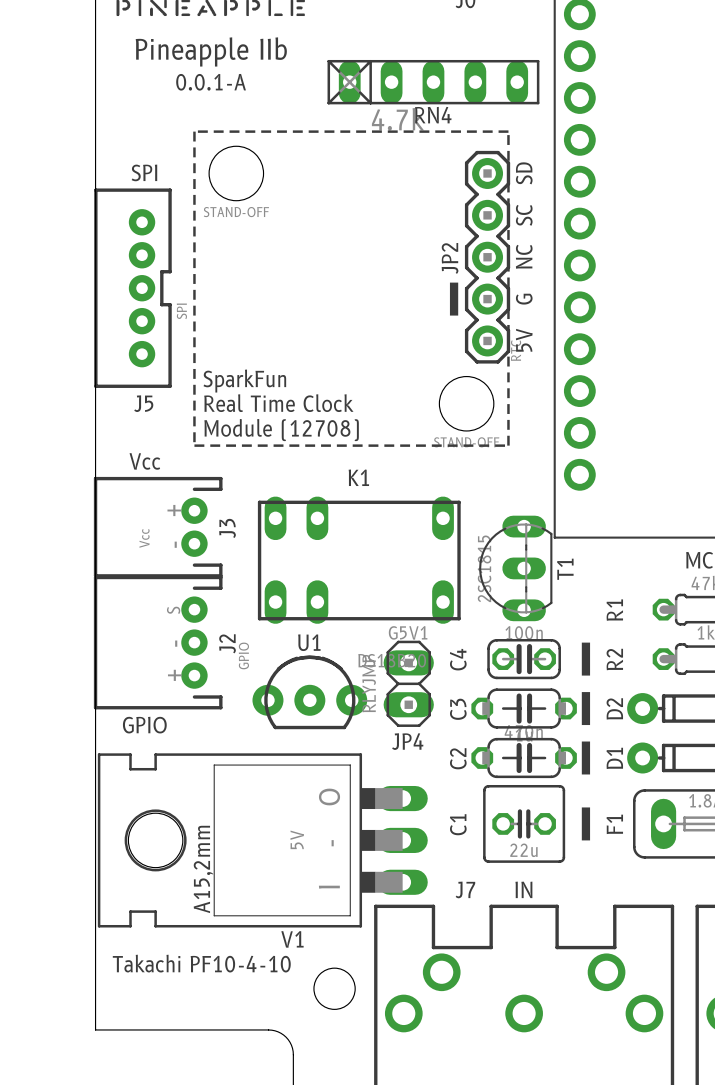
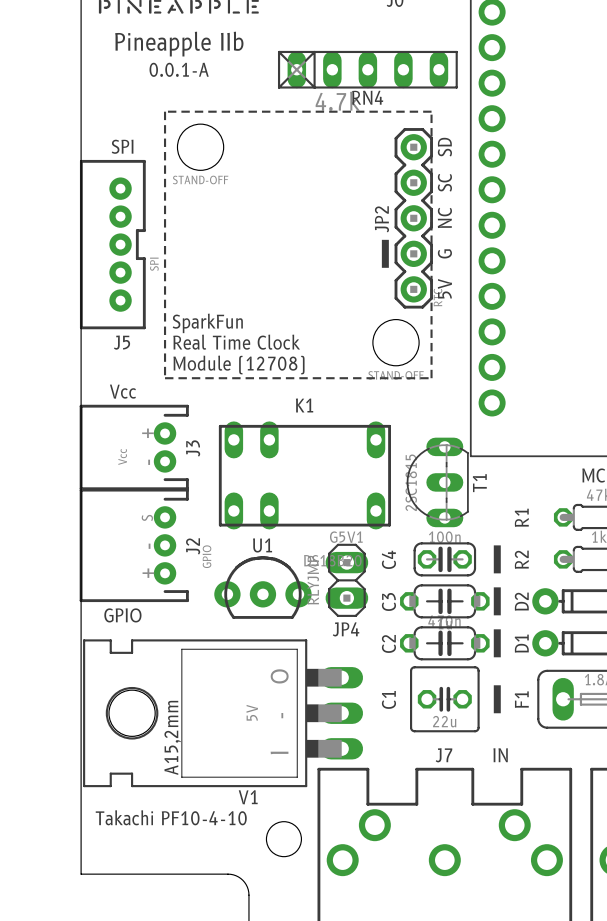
J7 name position: J7 (465, 889) -> J7 (444, 755)
text position: IN (523, 889) -> IN (500, 755)

